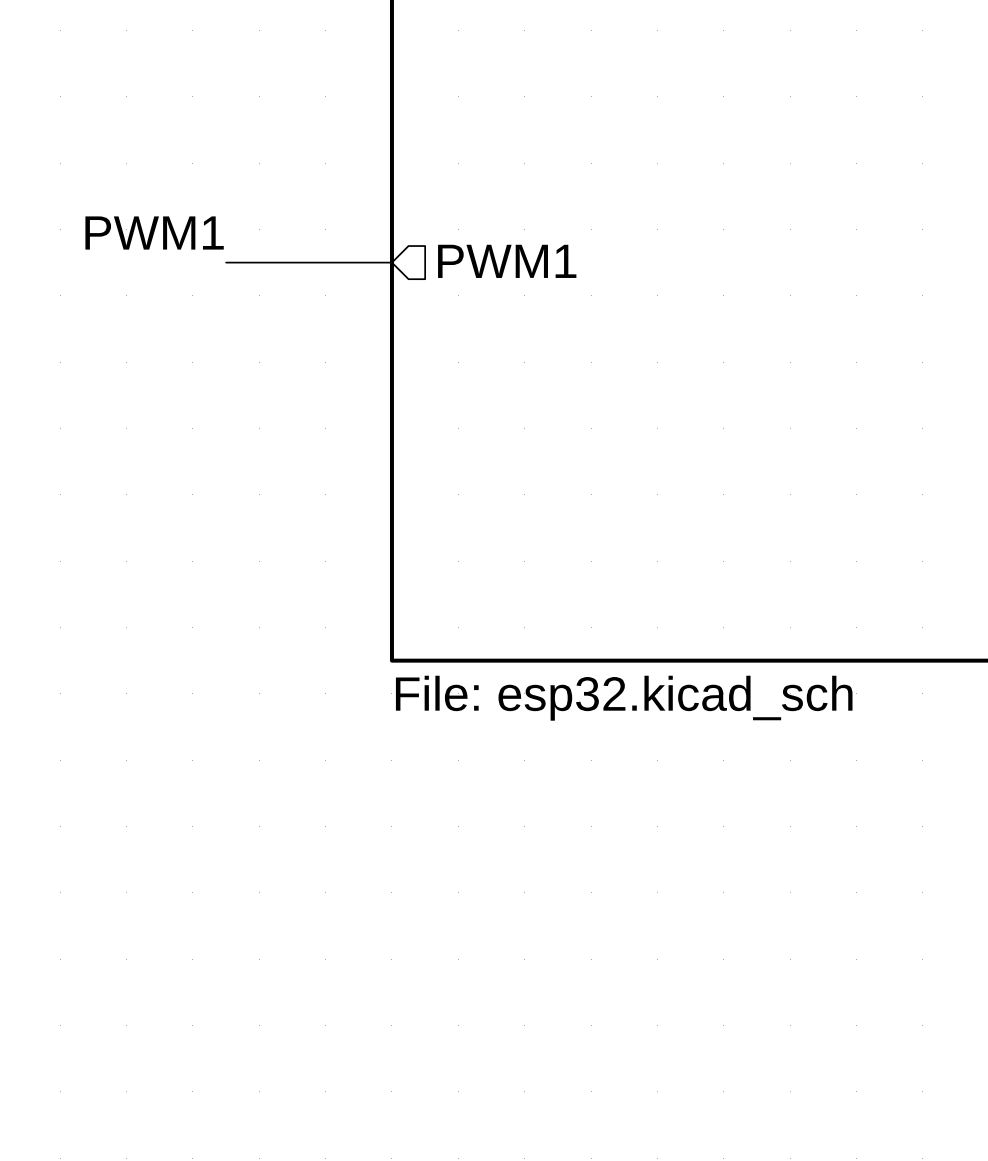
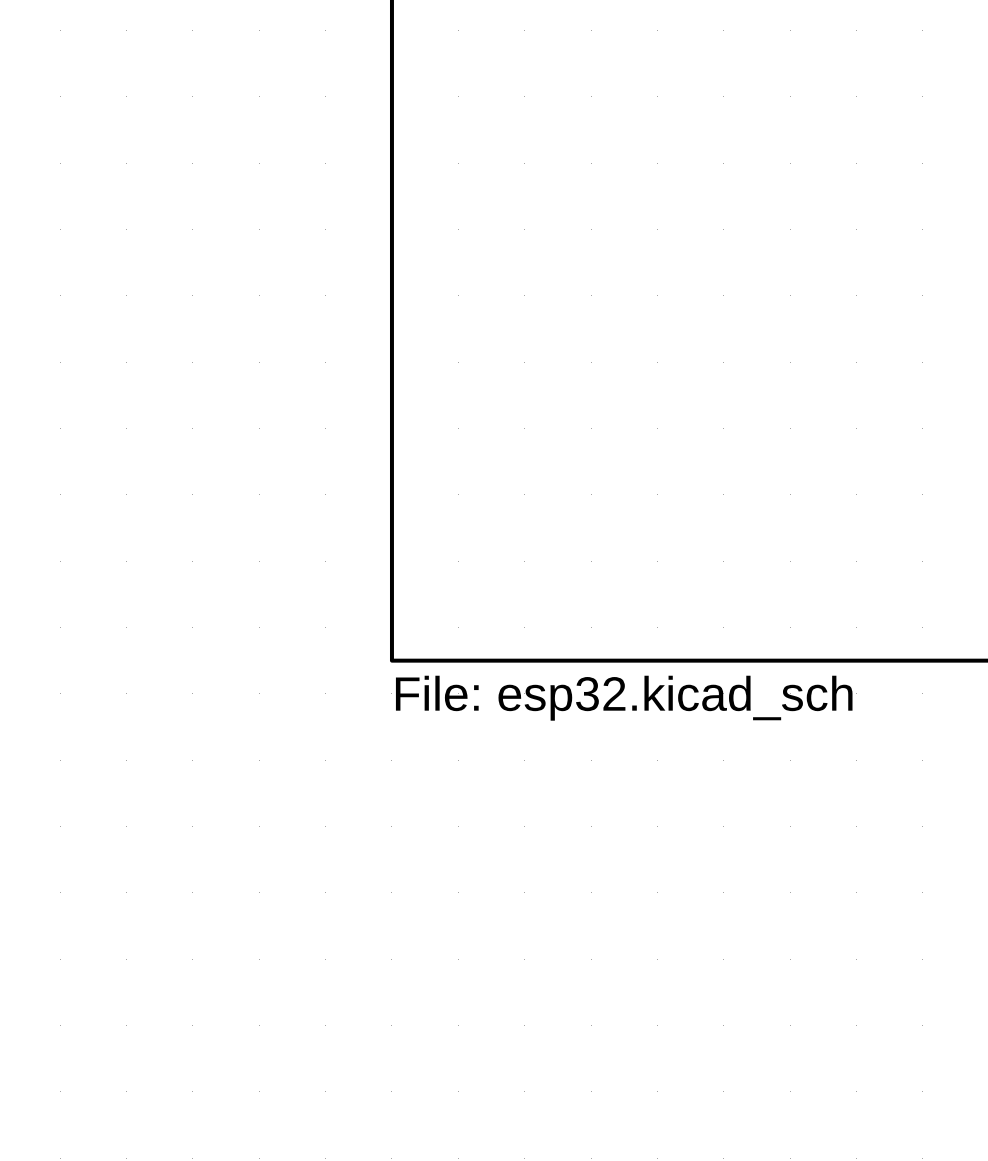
label: PWM1 (154, 233) -> none
sheet pin: PWM1 (507, 261) -> none
wire: (226, 262) (391, 262) -> none

